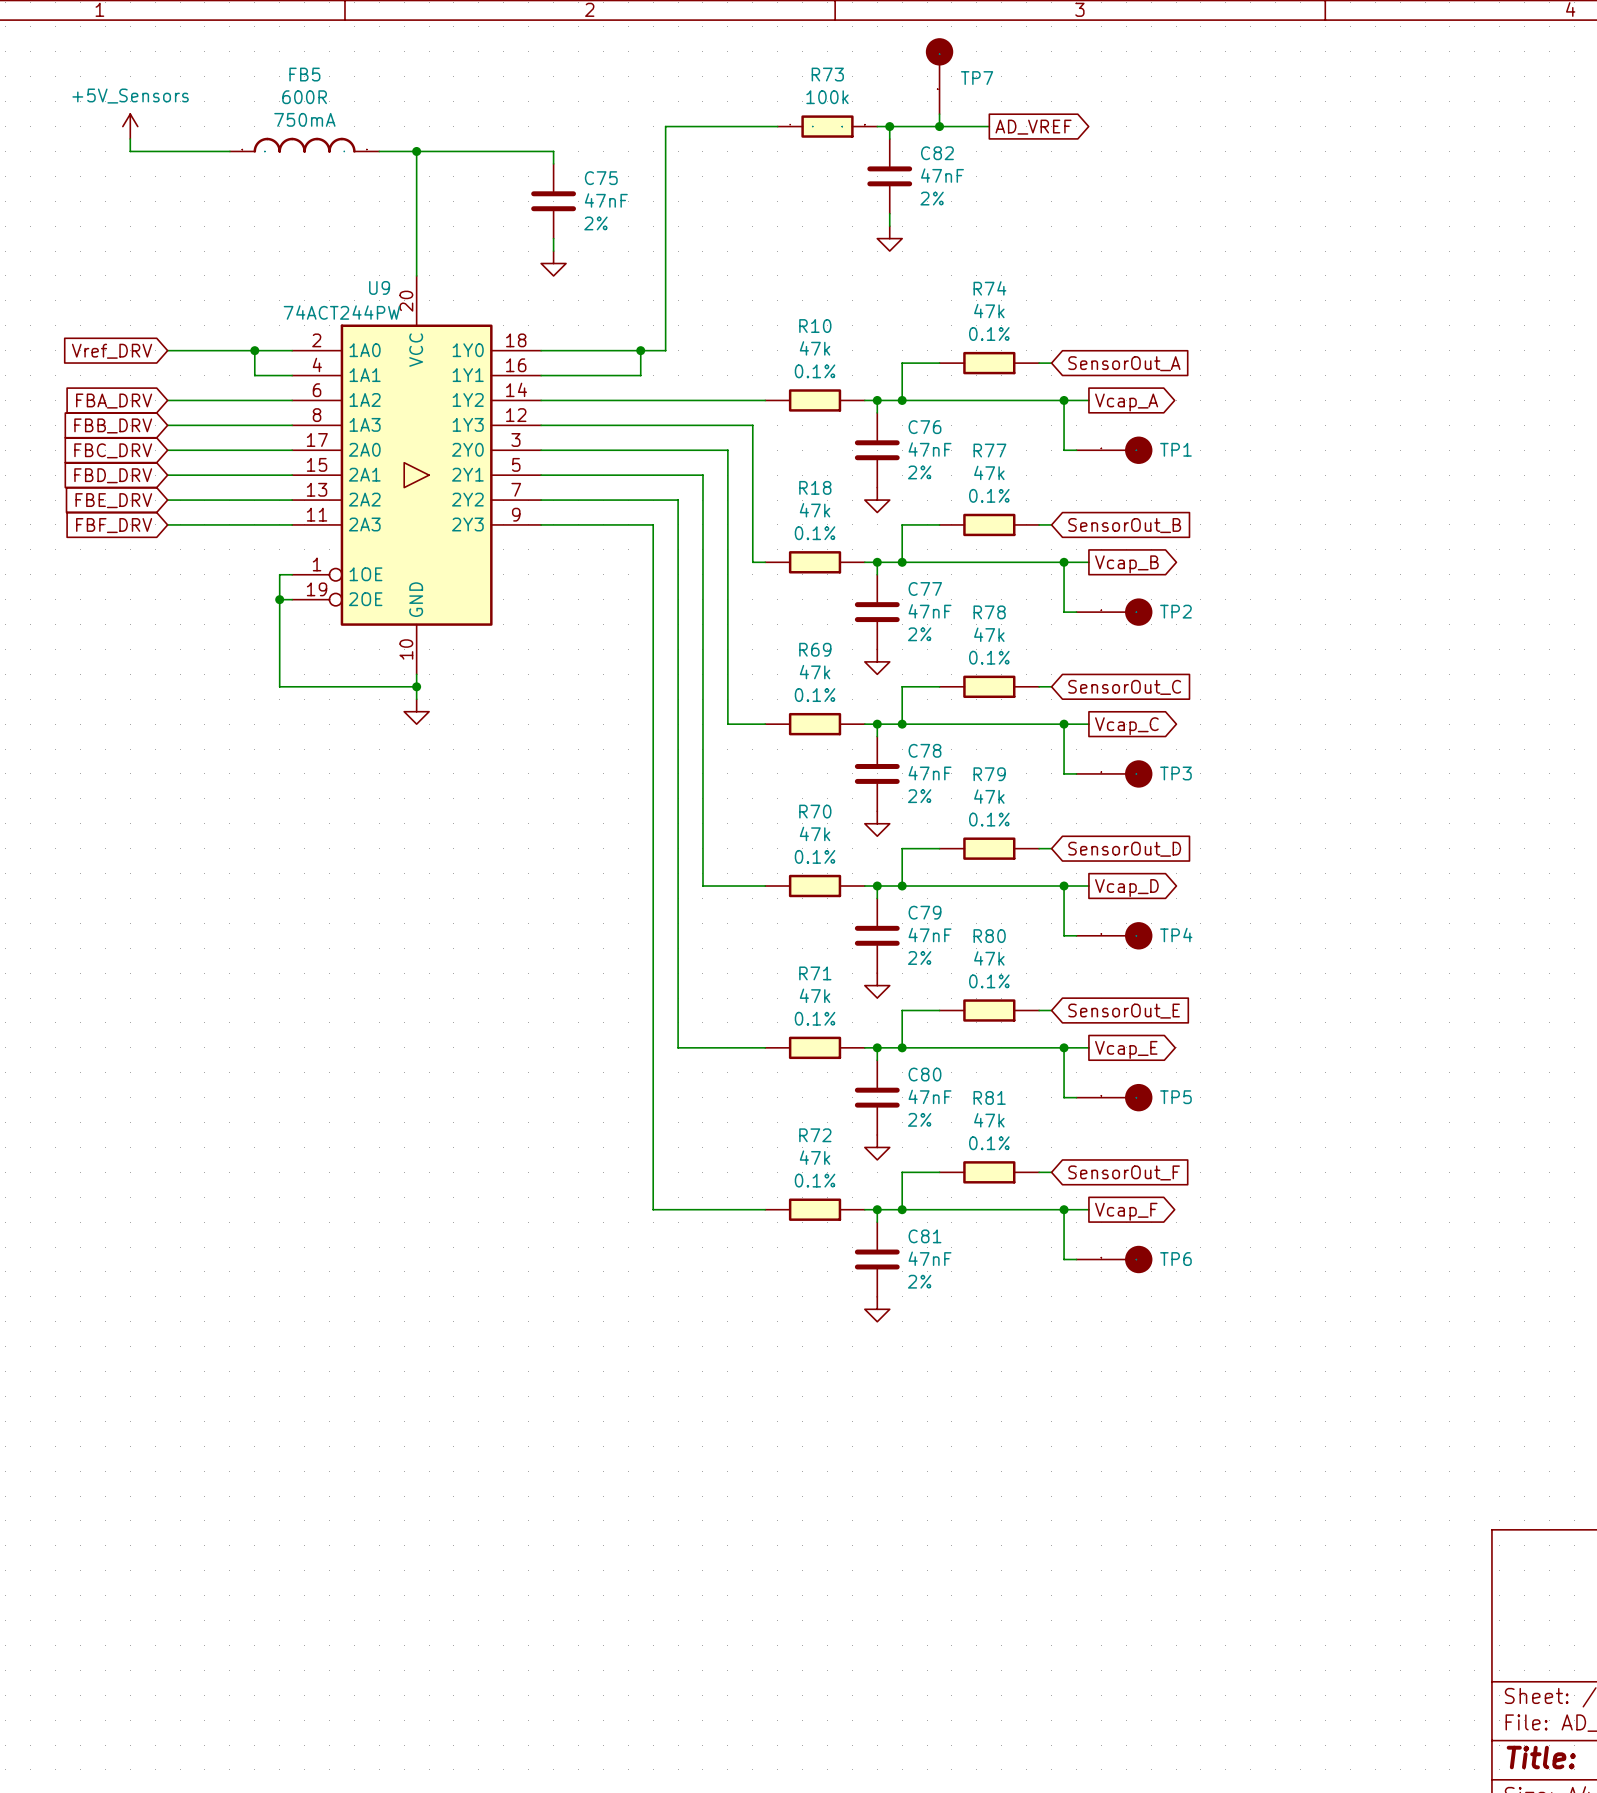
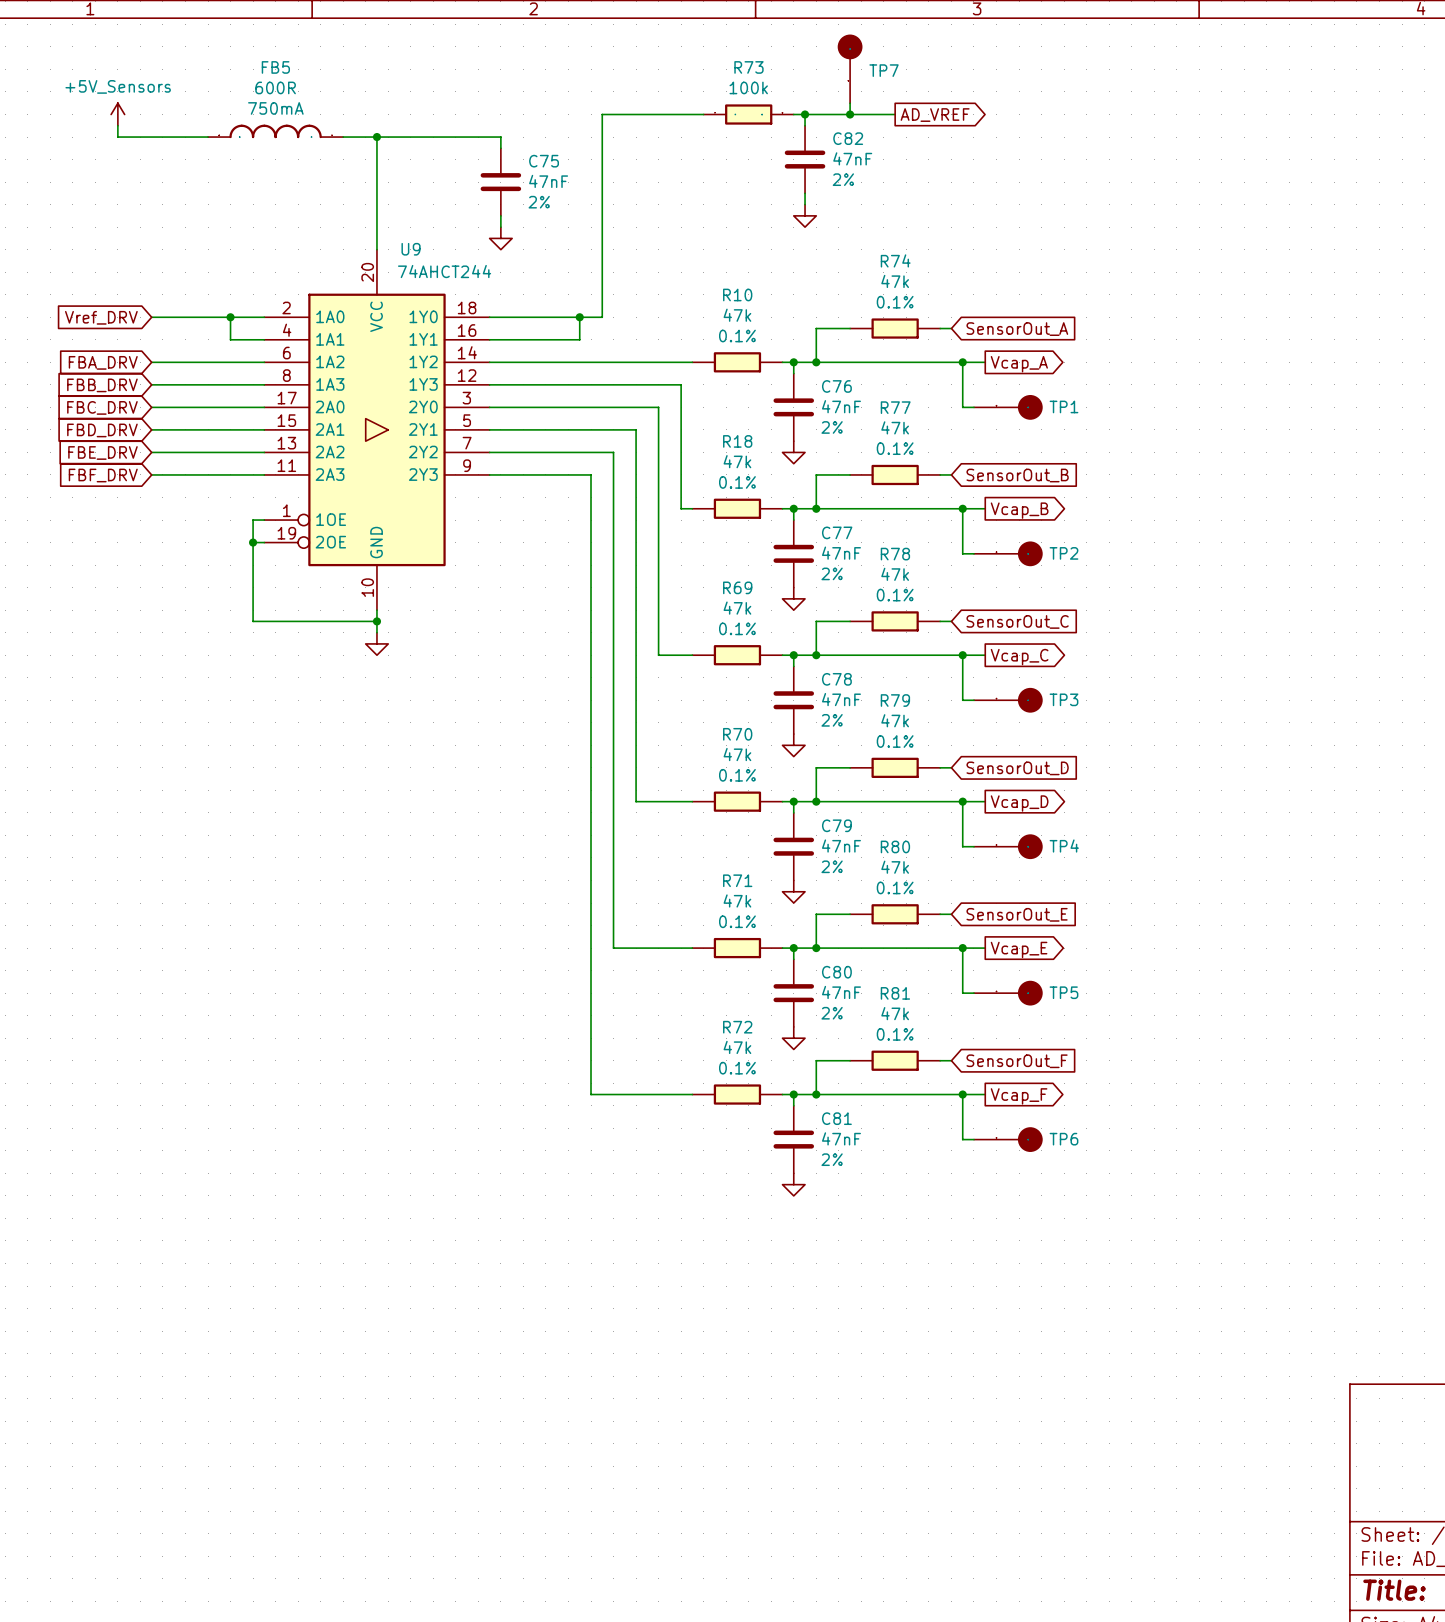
U9 name position: U9 (379, 287) -> U9 (411, 249)
U9 value: 74ACT244PW (341, 312) -> 74AHCT244 (444, 271)

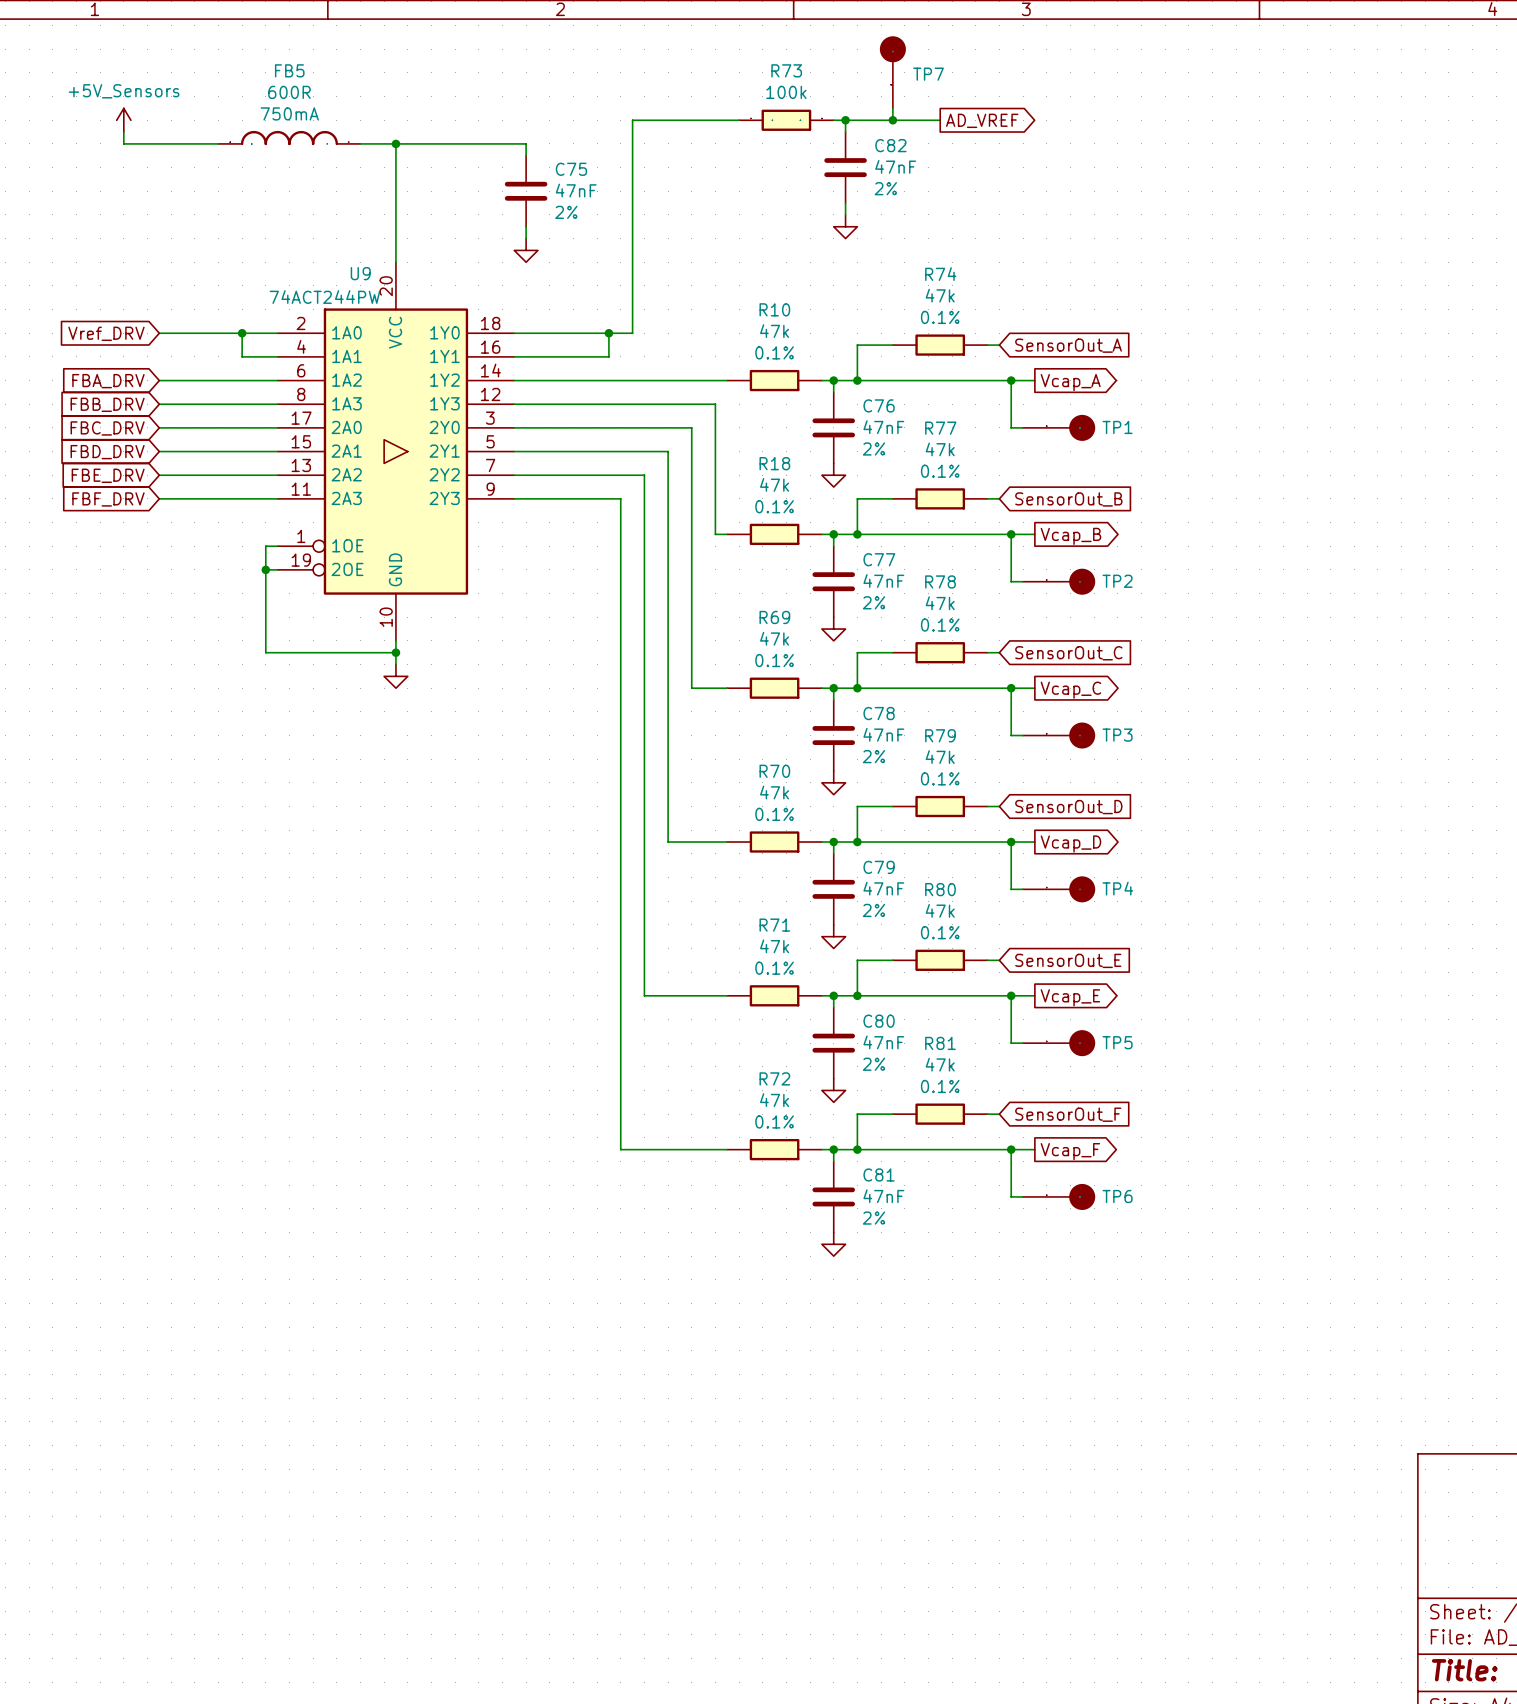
U9 name position: U9 (411, 249) -> U9 (360, 273)
U9 value: 74AHCT244 (444, 271) -> 74ACT244PW (324, 297)

